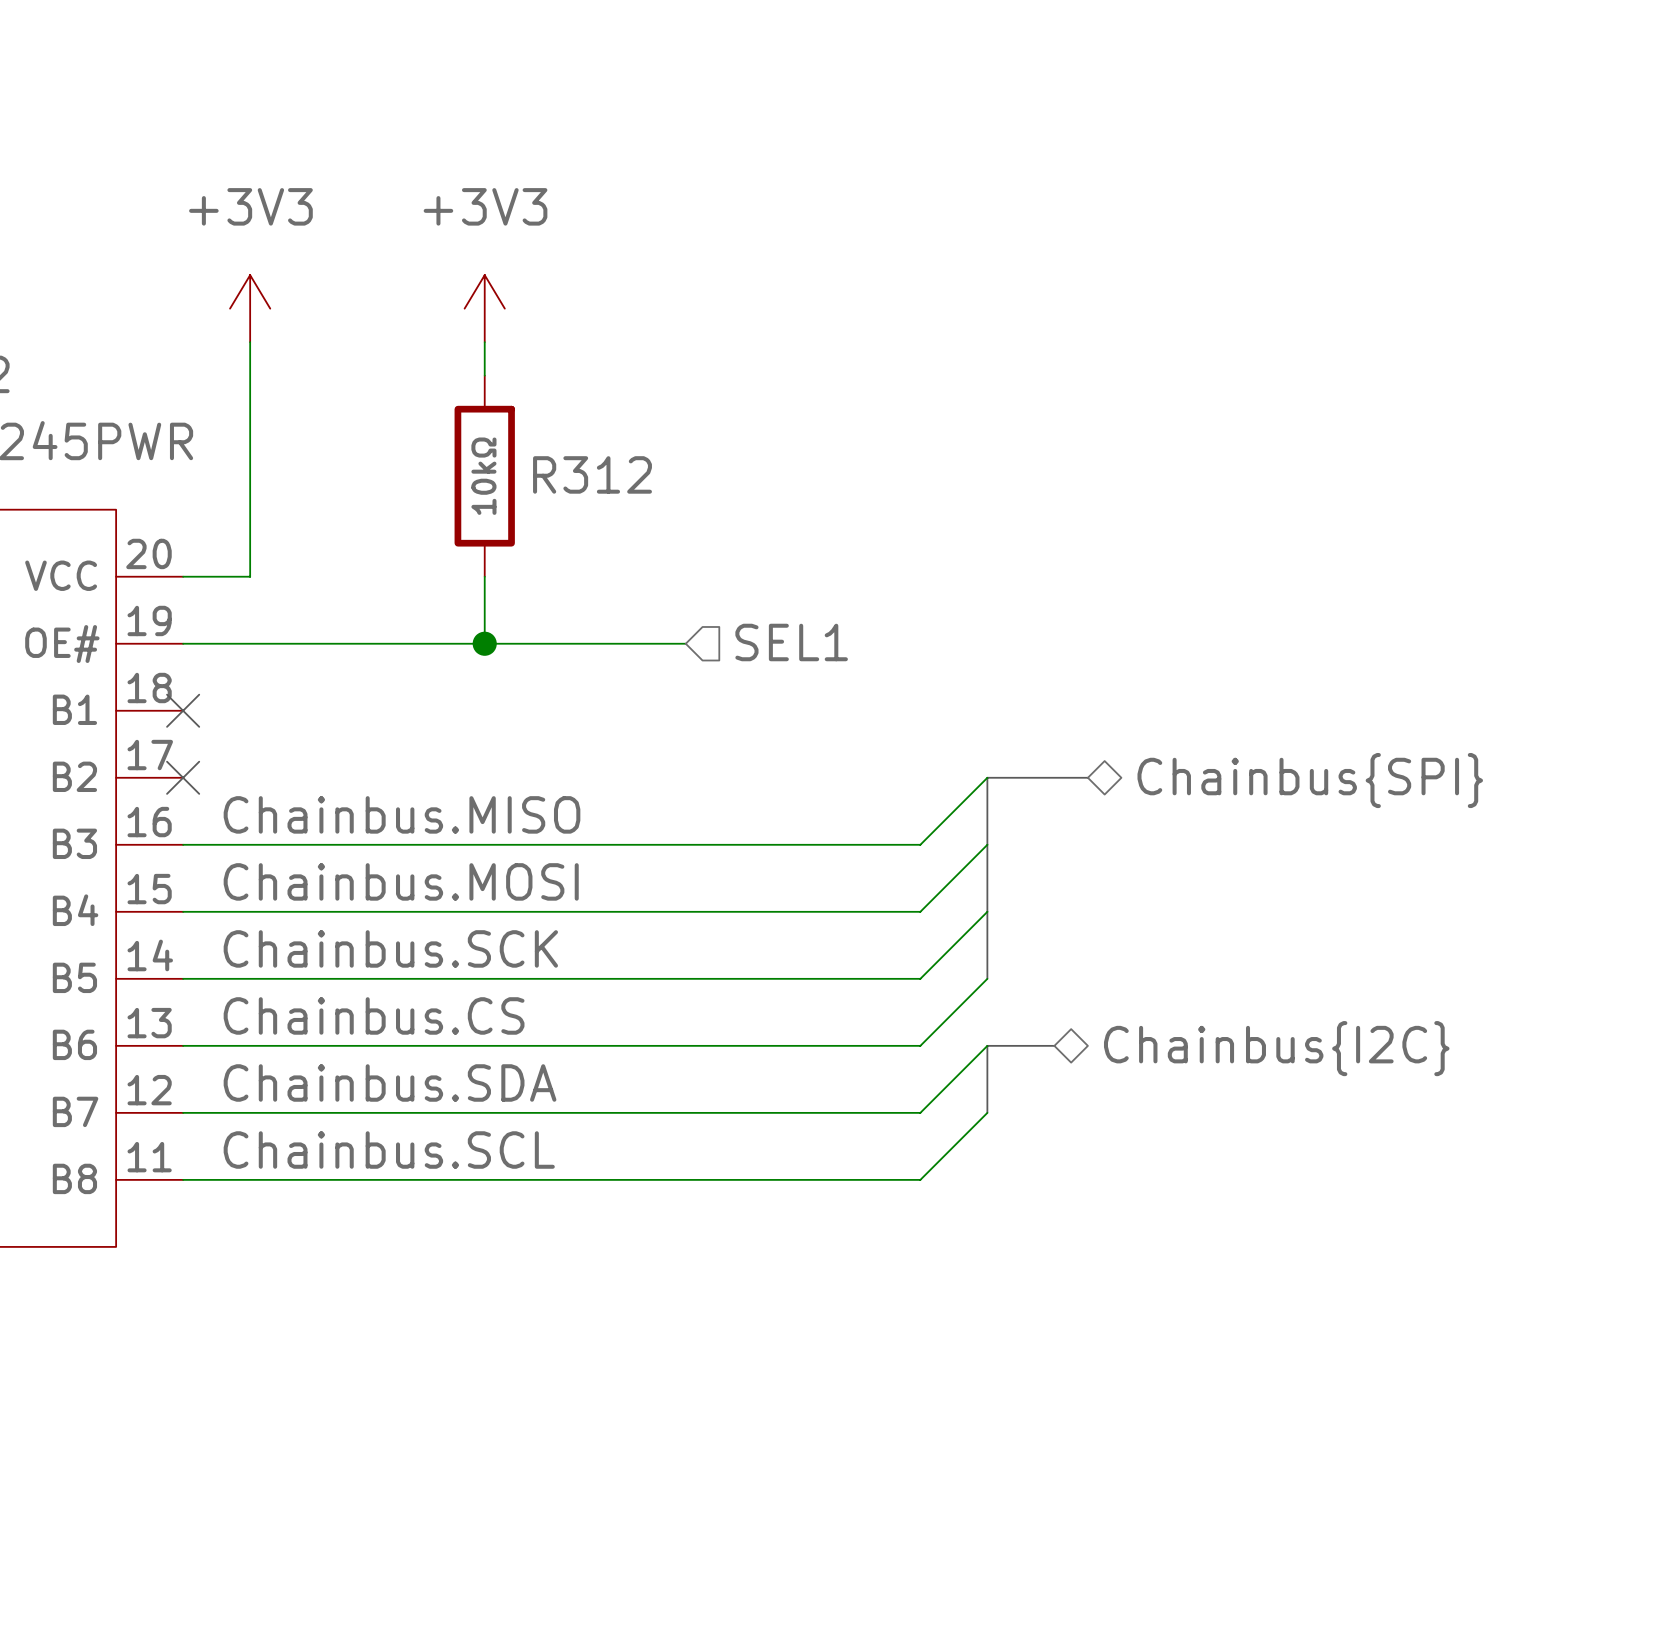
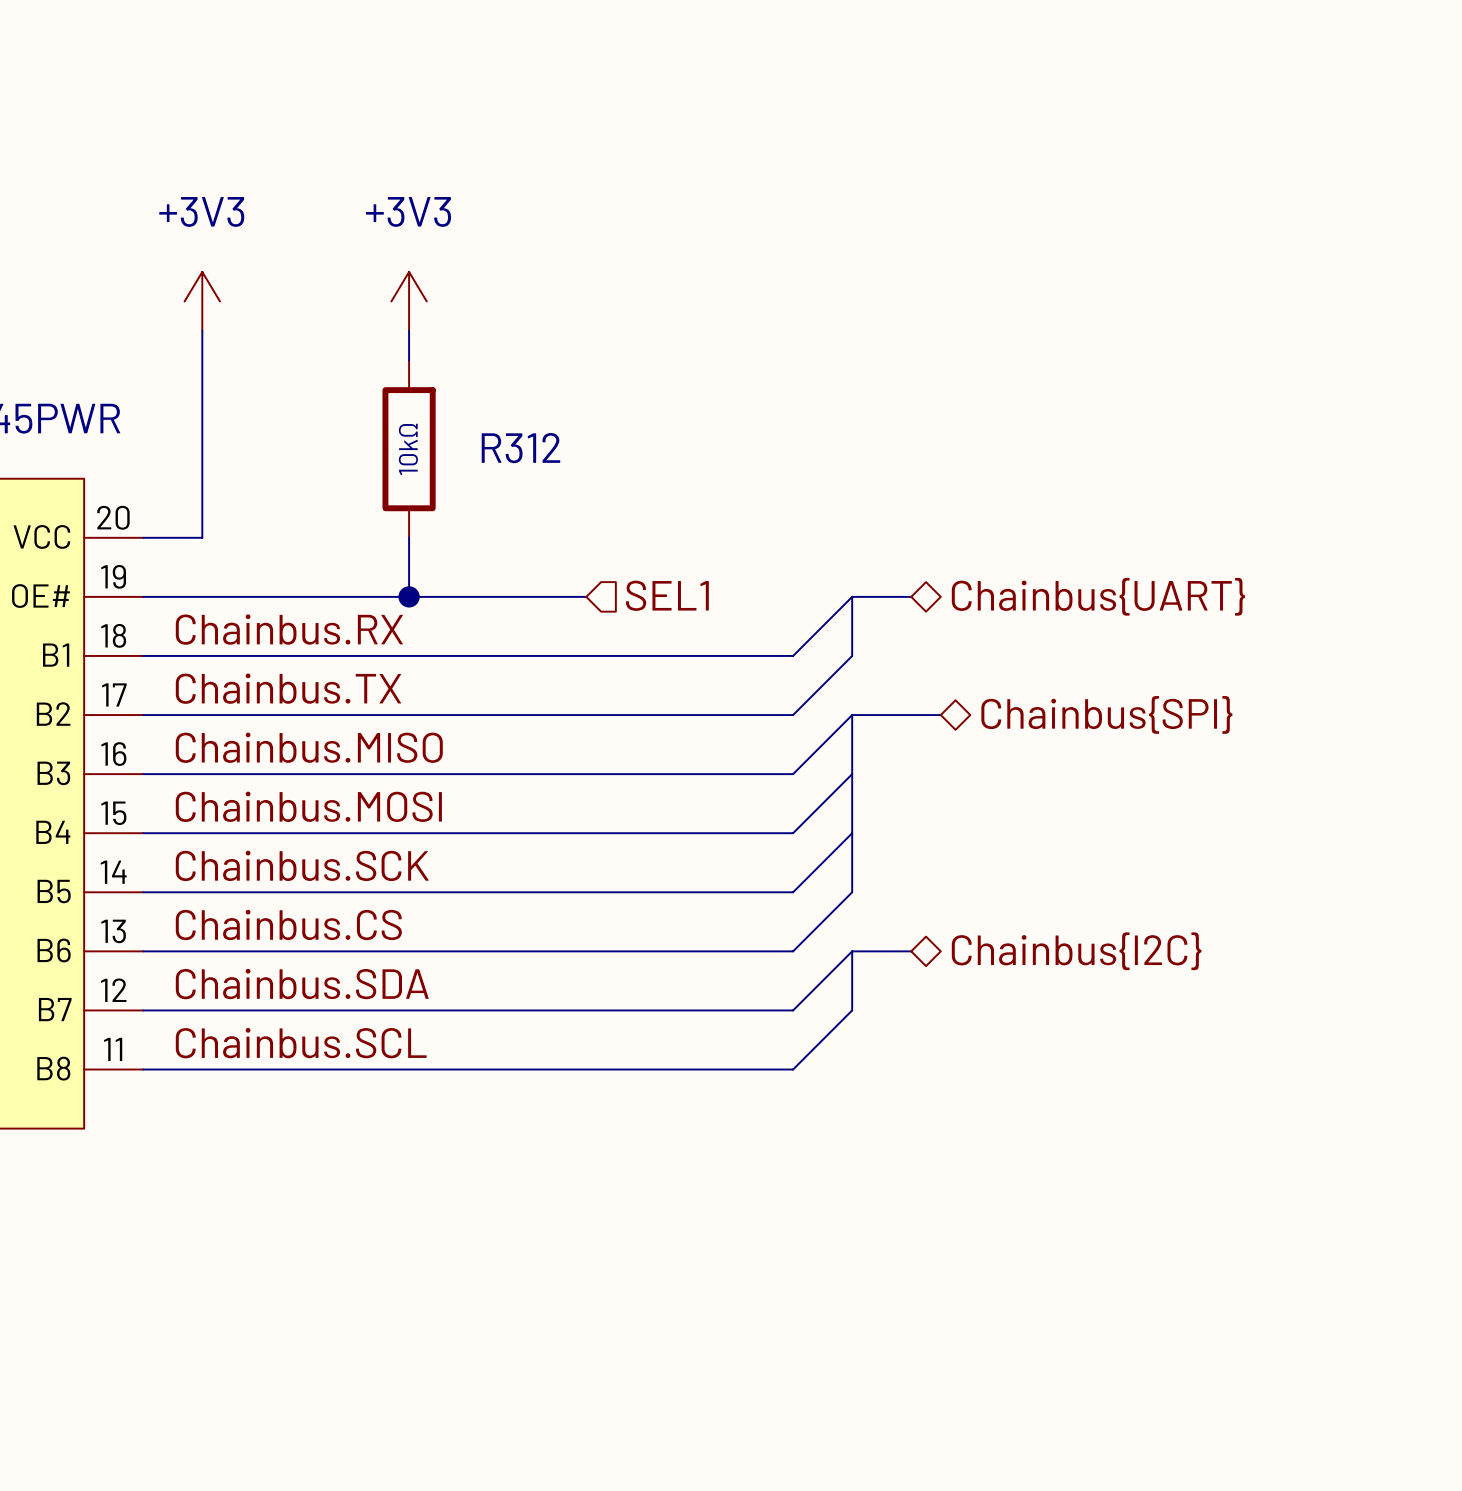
wire: none -> (852, 596) (793, 655) (143, 655)
bus: none -> (911, 596) (852, 596) (852, 655)
hierarchical label: none -> Chainbus{UART} (1098, 596)
label: none -> Chainbus.RX (289, 629)
no-connect mark: (183, 710) -> none
wire: none -> (852, 655) (793, 715) (143, 715)
label: none -> Chainbus.TX (288, 688)
no-connect mark: (183, 777) -> none

